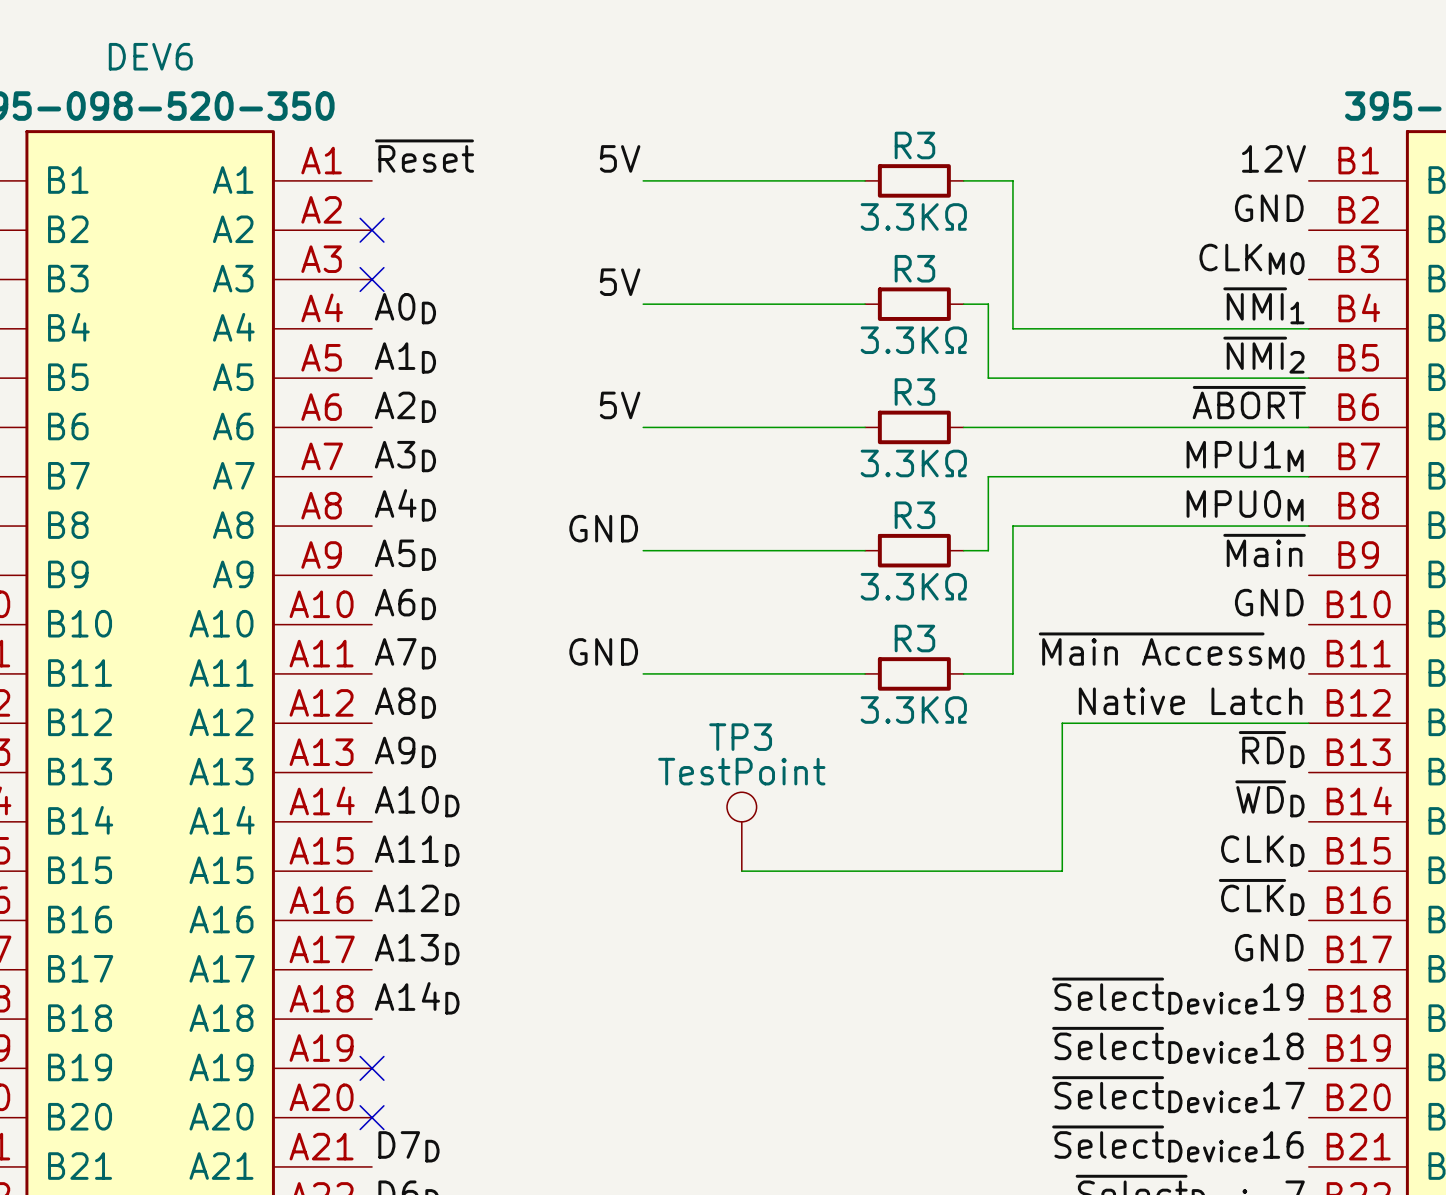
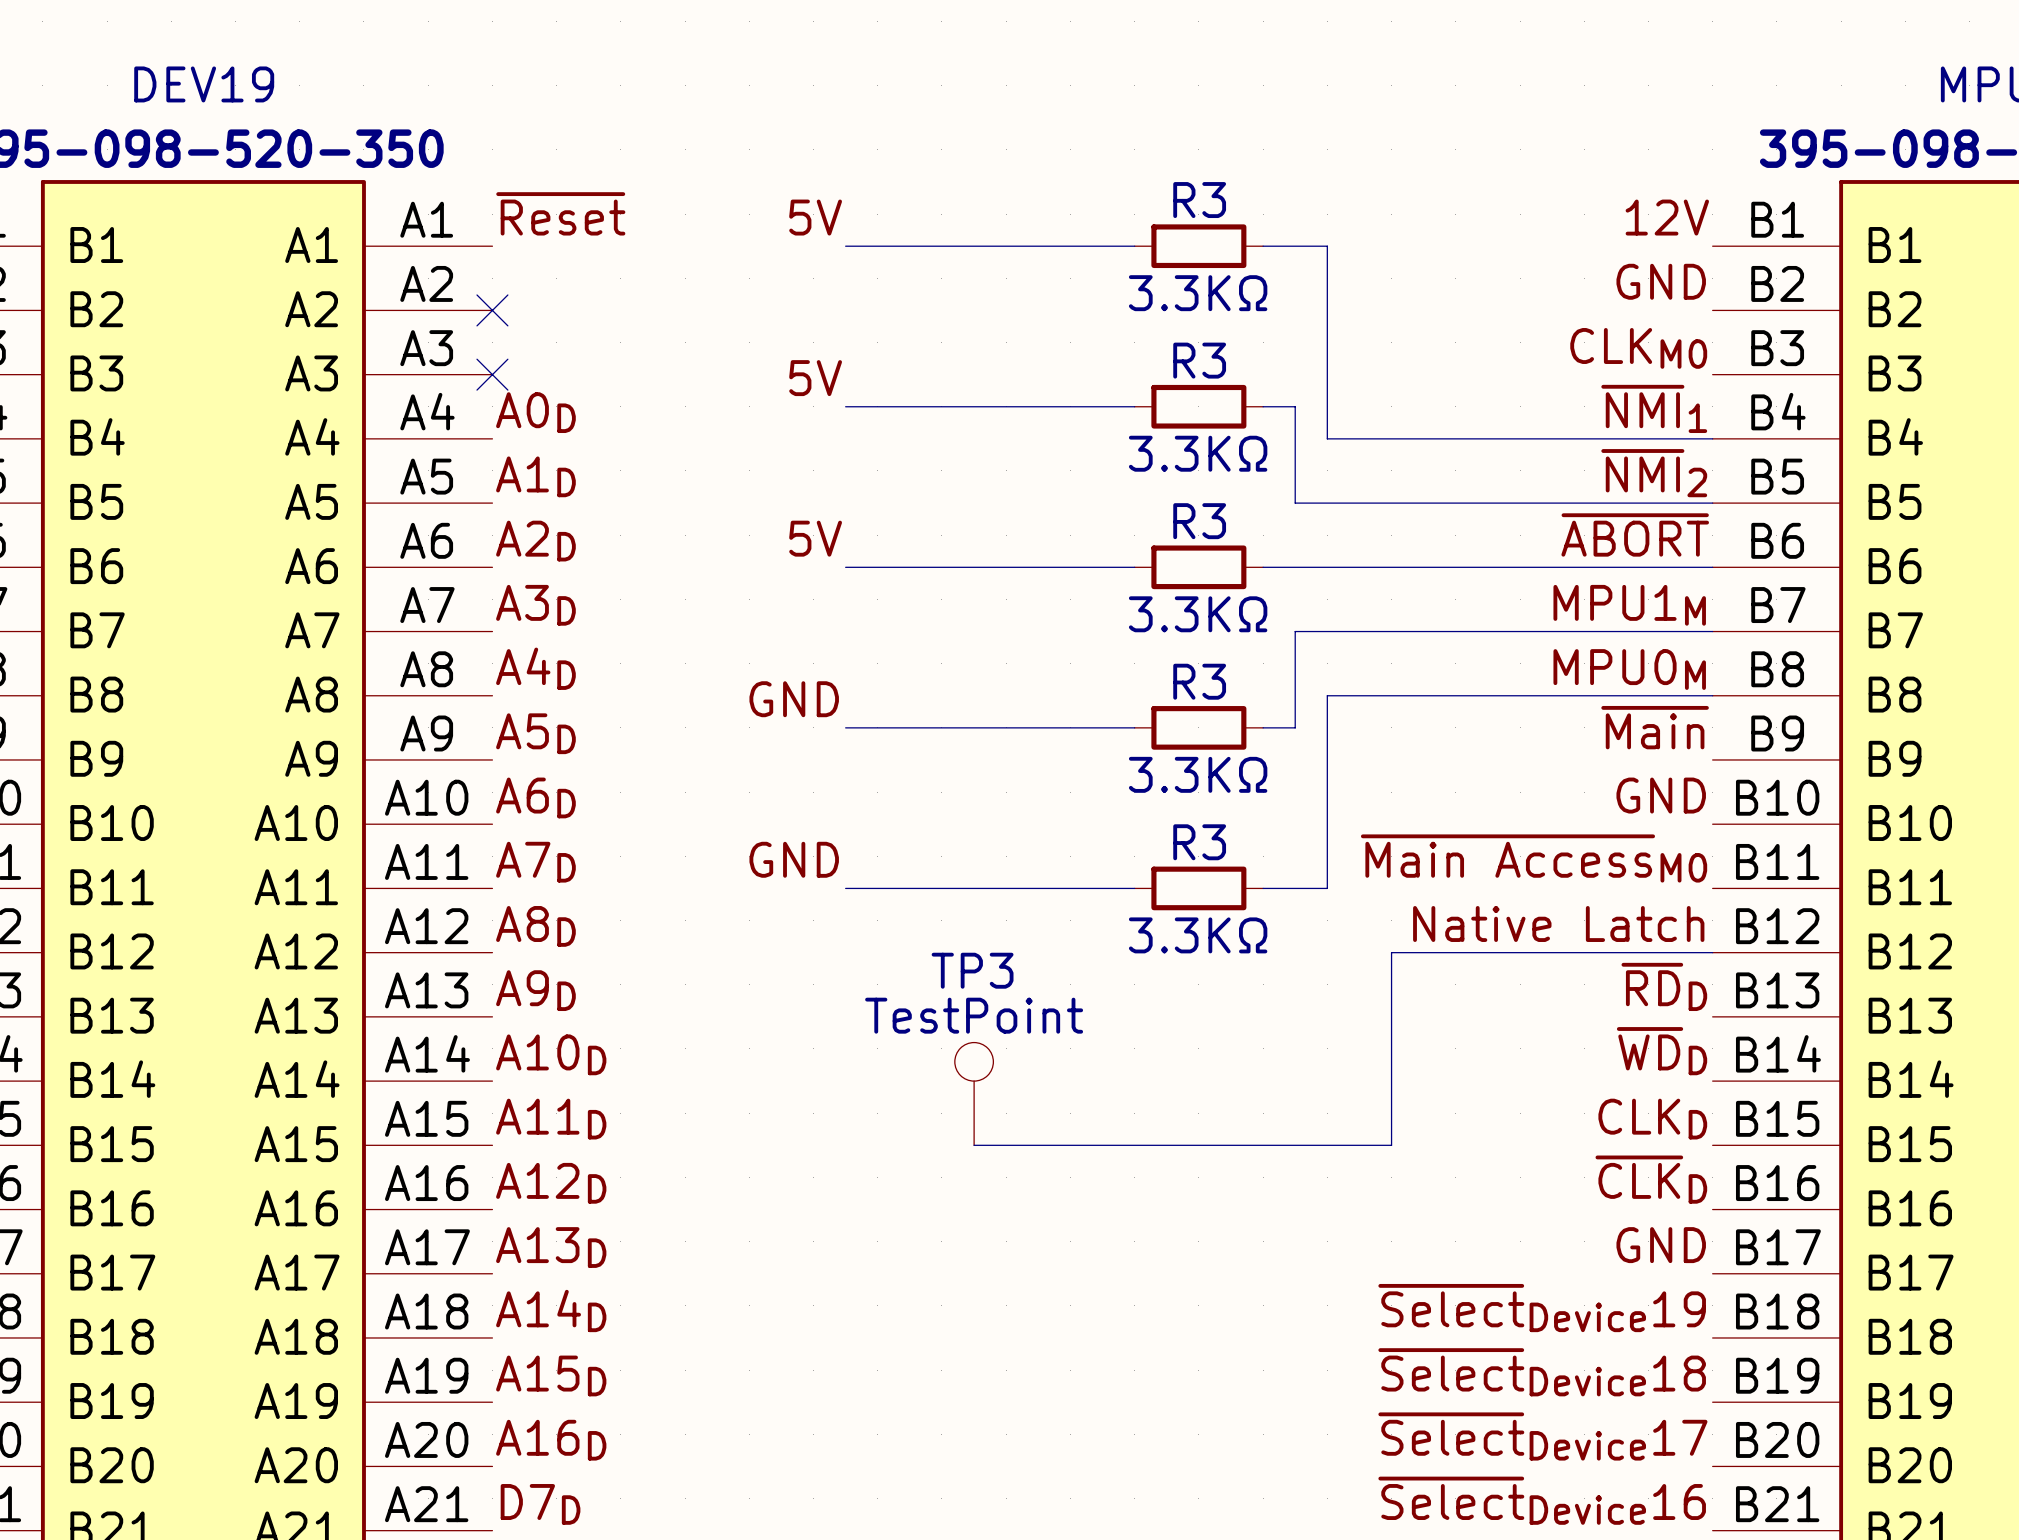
DEV6 name: DEV6 (150, 56) -> DEV19 (204, 84)
label: none -> A15D (551, 1375)
no-connect mark: (372, 1068) -> none
label: none -> A16D (551, 1440)
no-connect mark: (372, 1117) -> none

